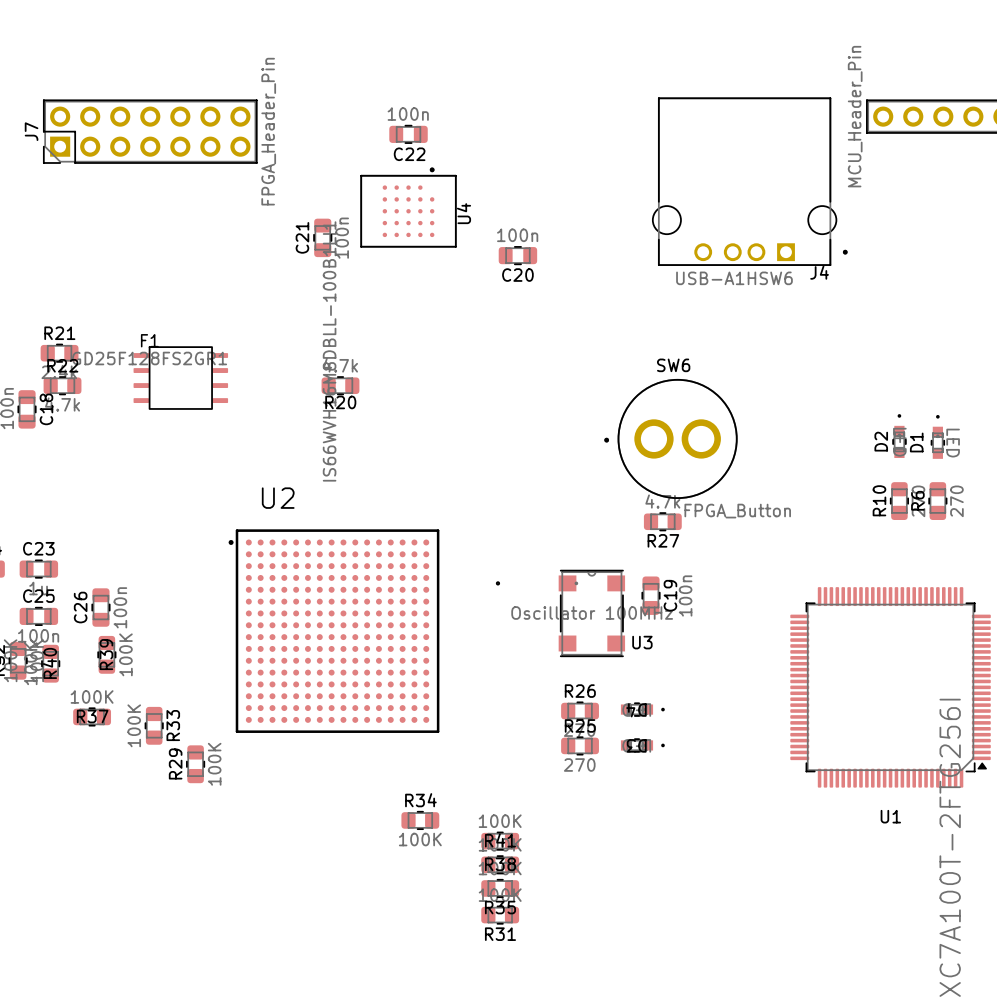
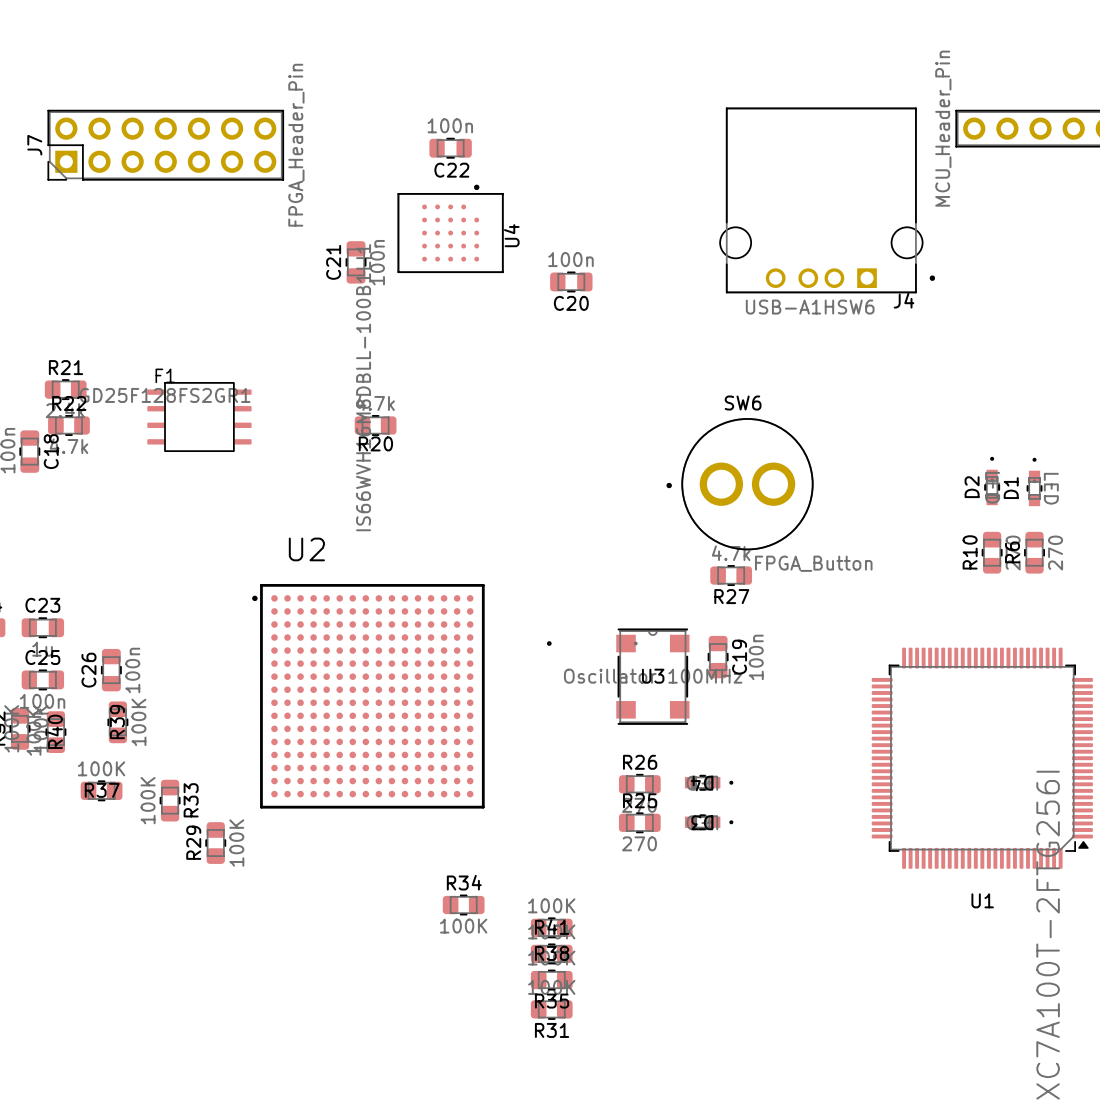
U3 name position: U3 (642, 642) -> U3 (653, 676)

